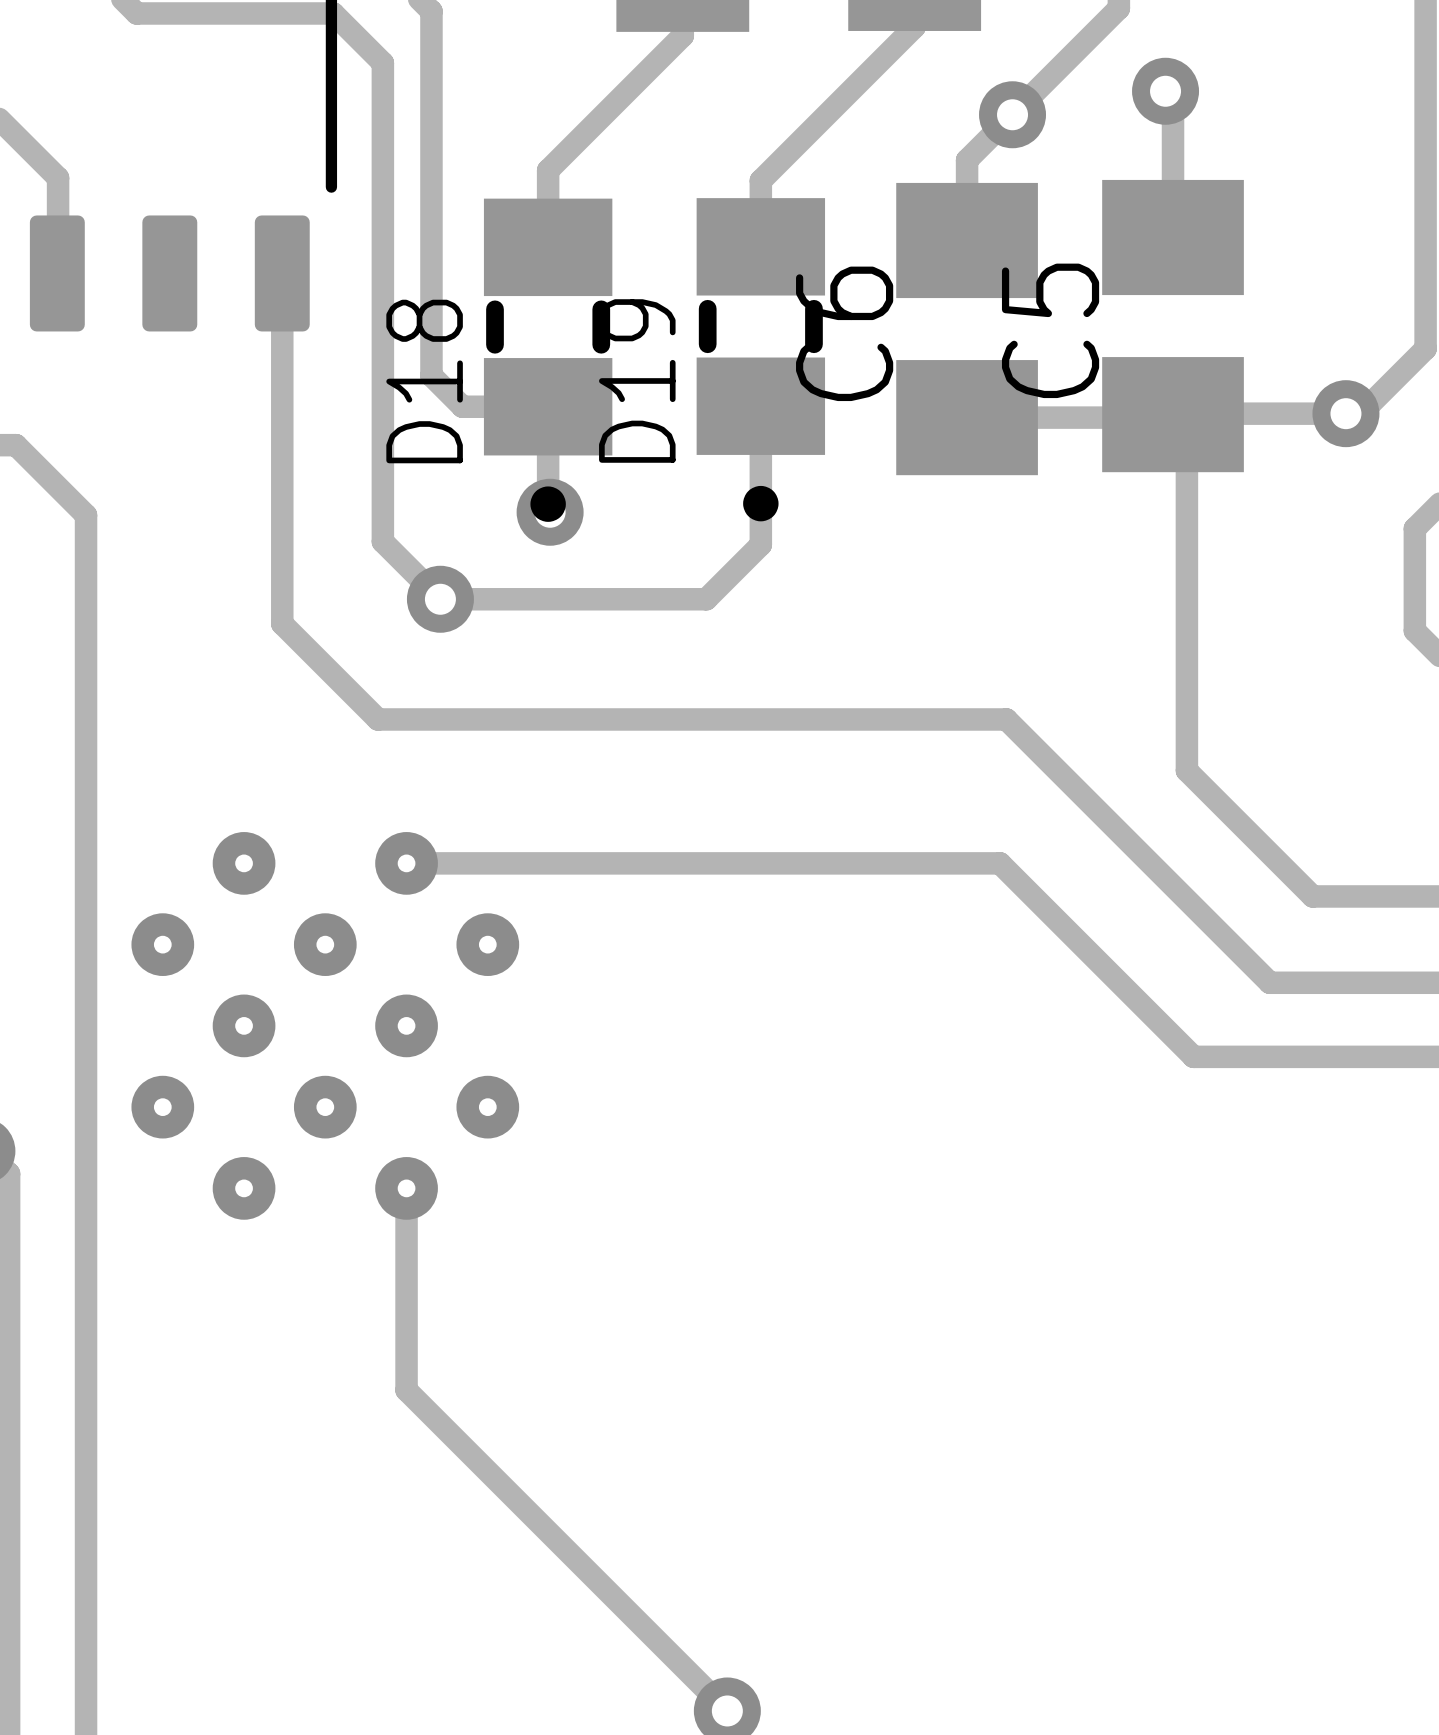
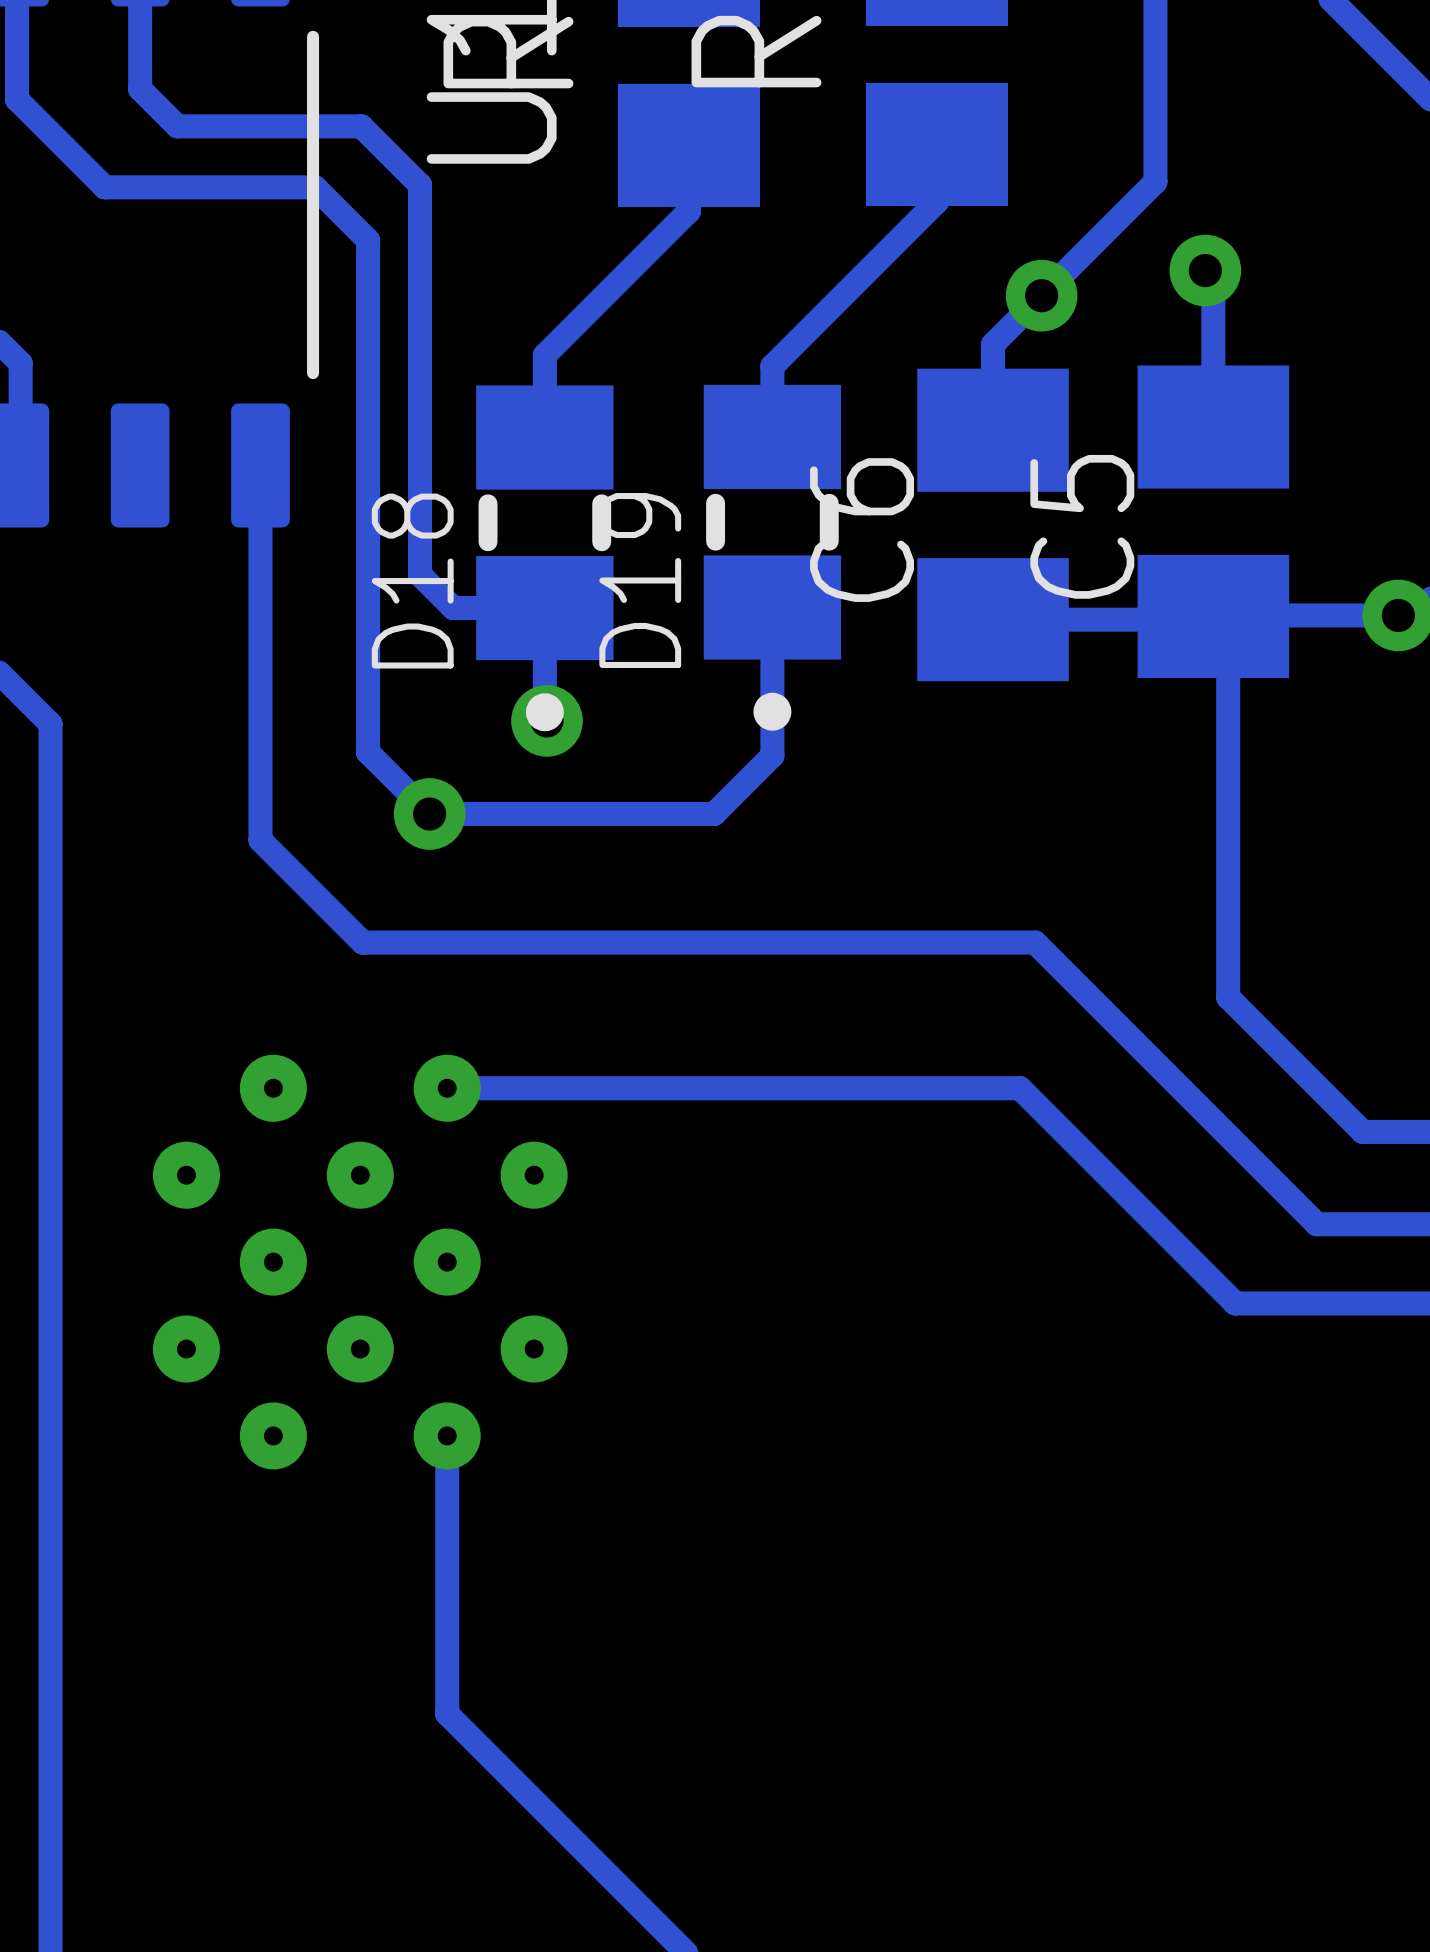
track: (1000, 863) (406, 863) -> (1028, 1096) (1020, 1088) (447, 1088)
part position: (325, 1025) -> (360, 1262)
track: (406, 1188) (406, 1390) (456, 1440) -> (447, 1435) (447, 1713)

